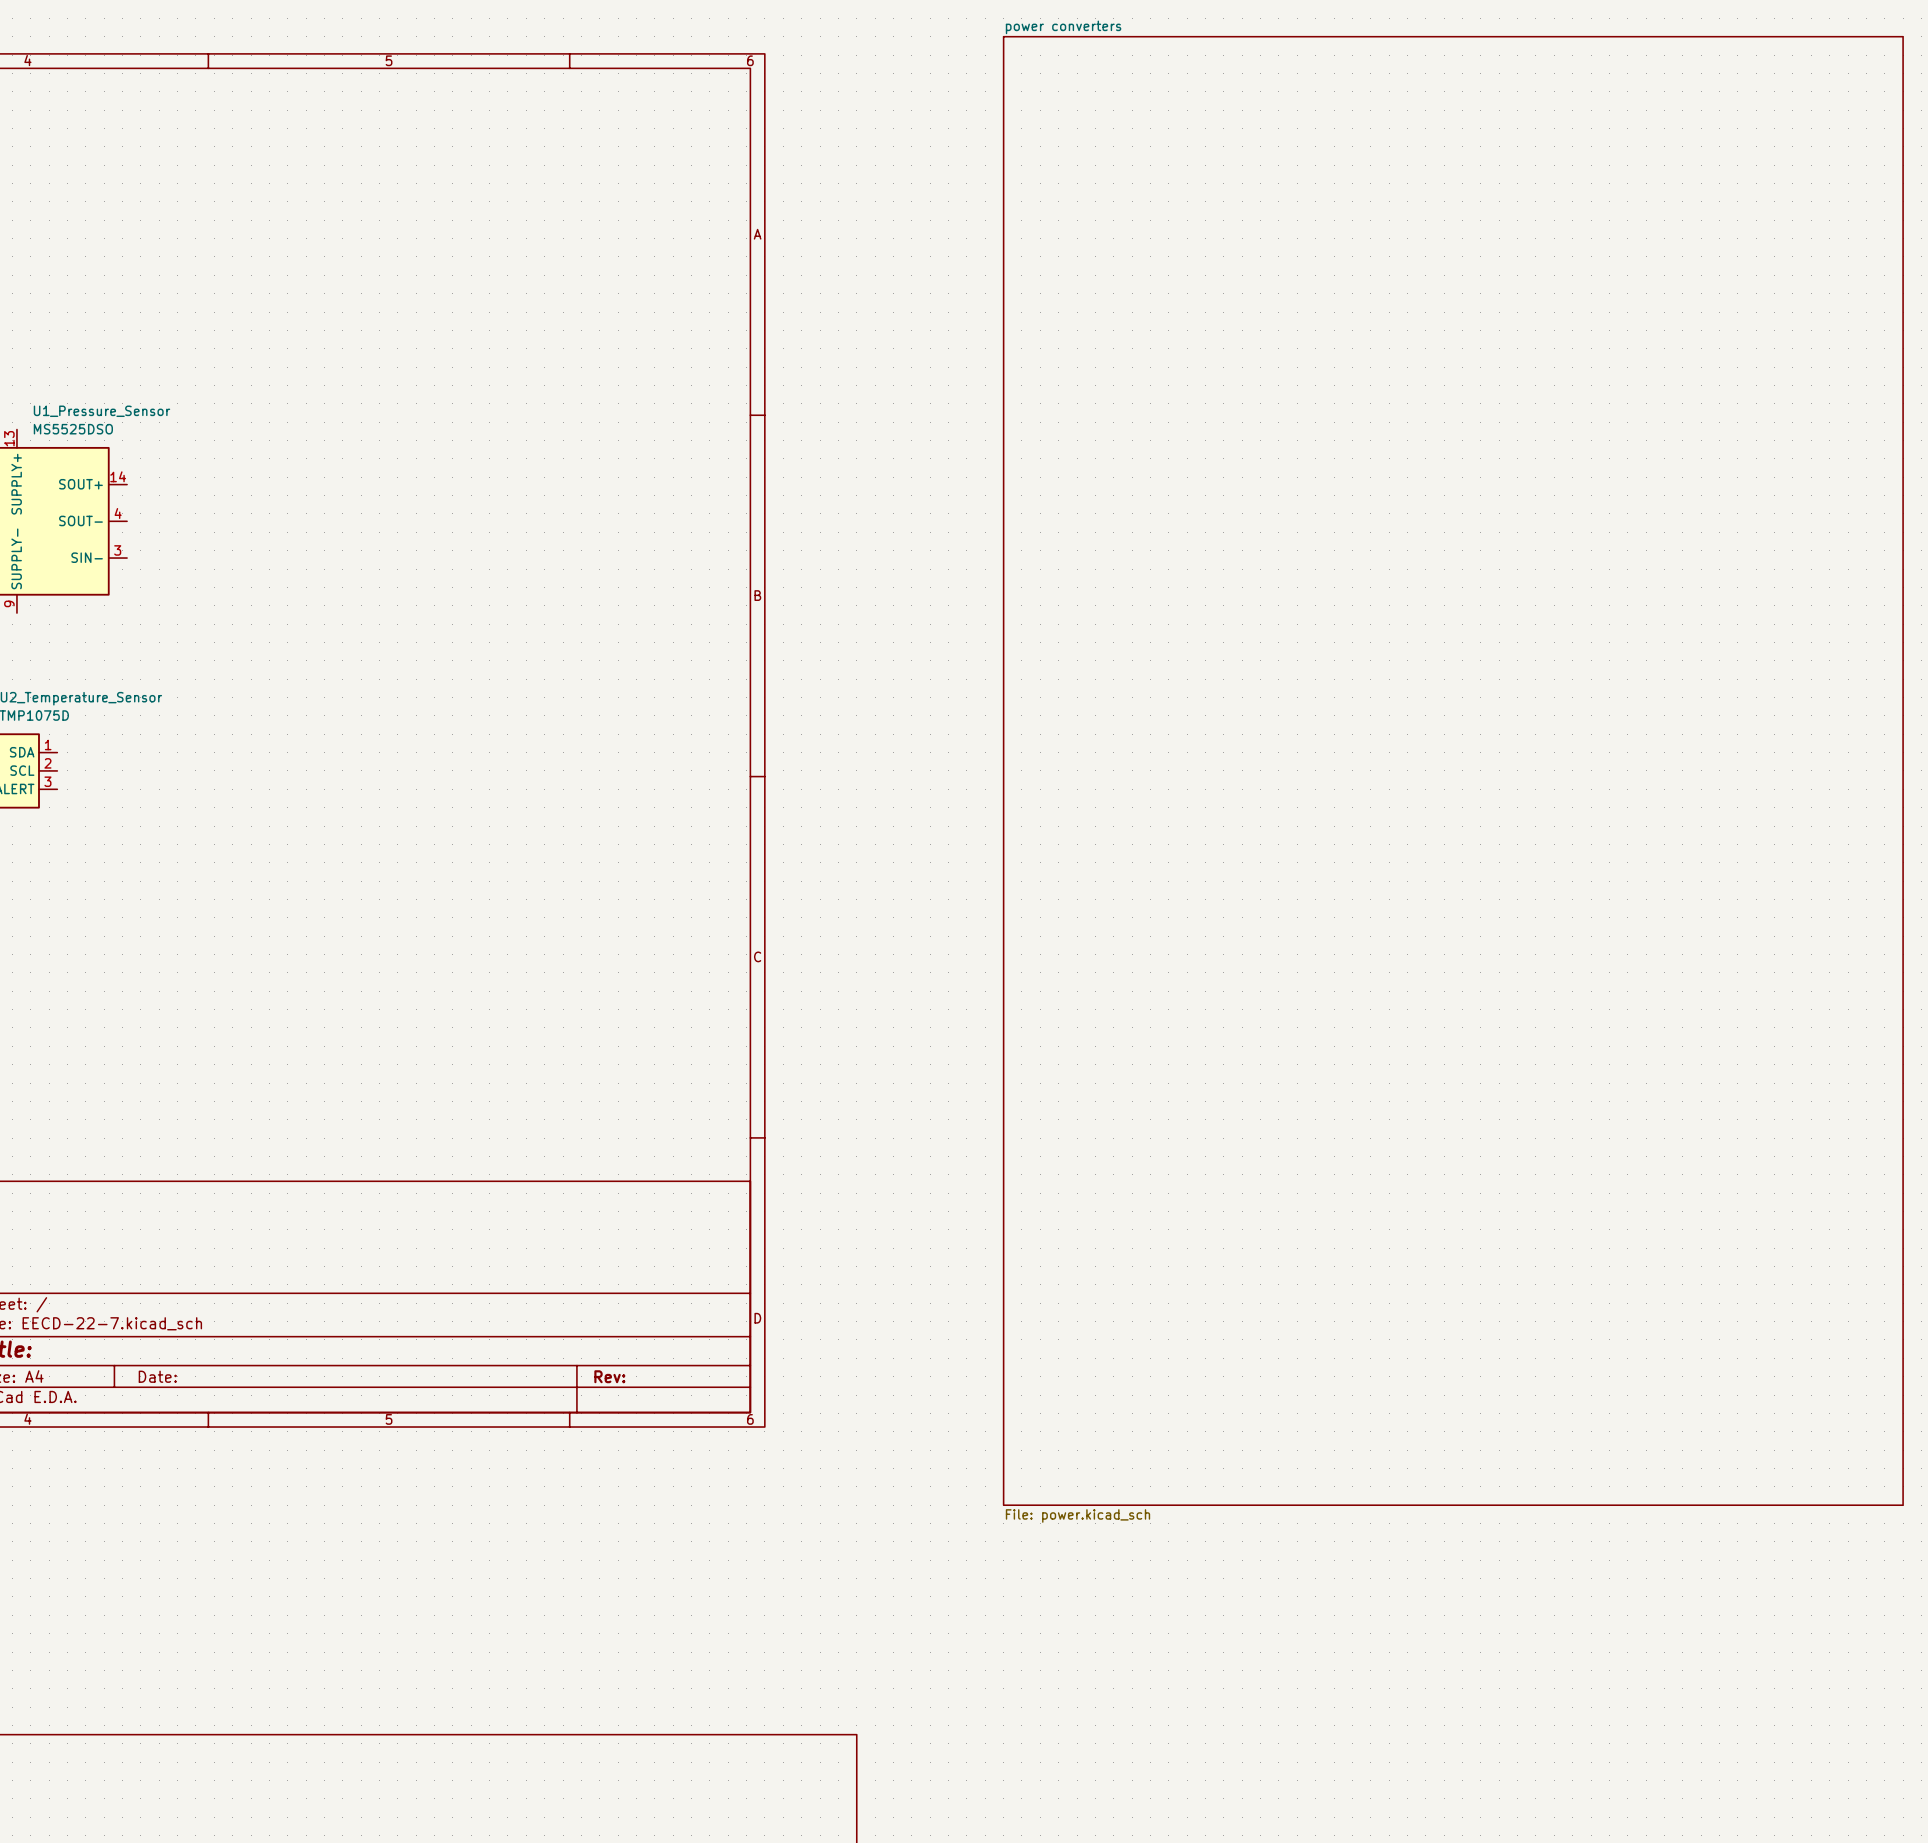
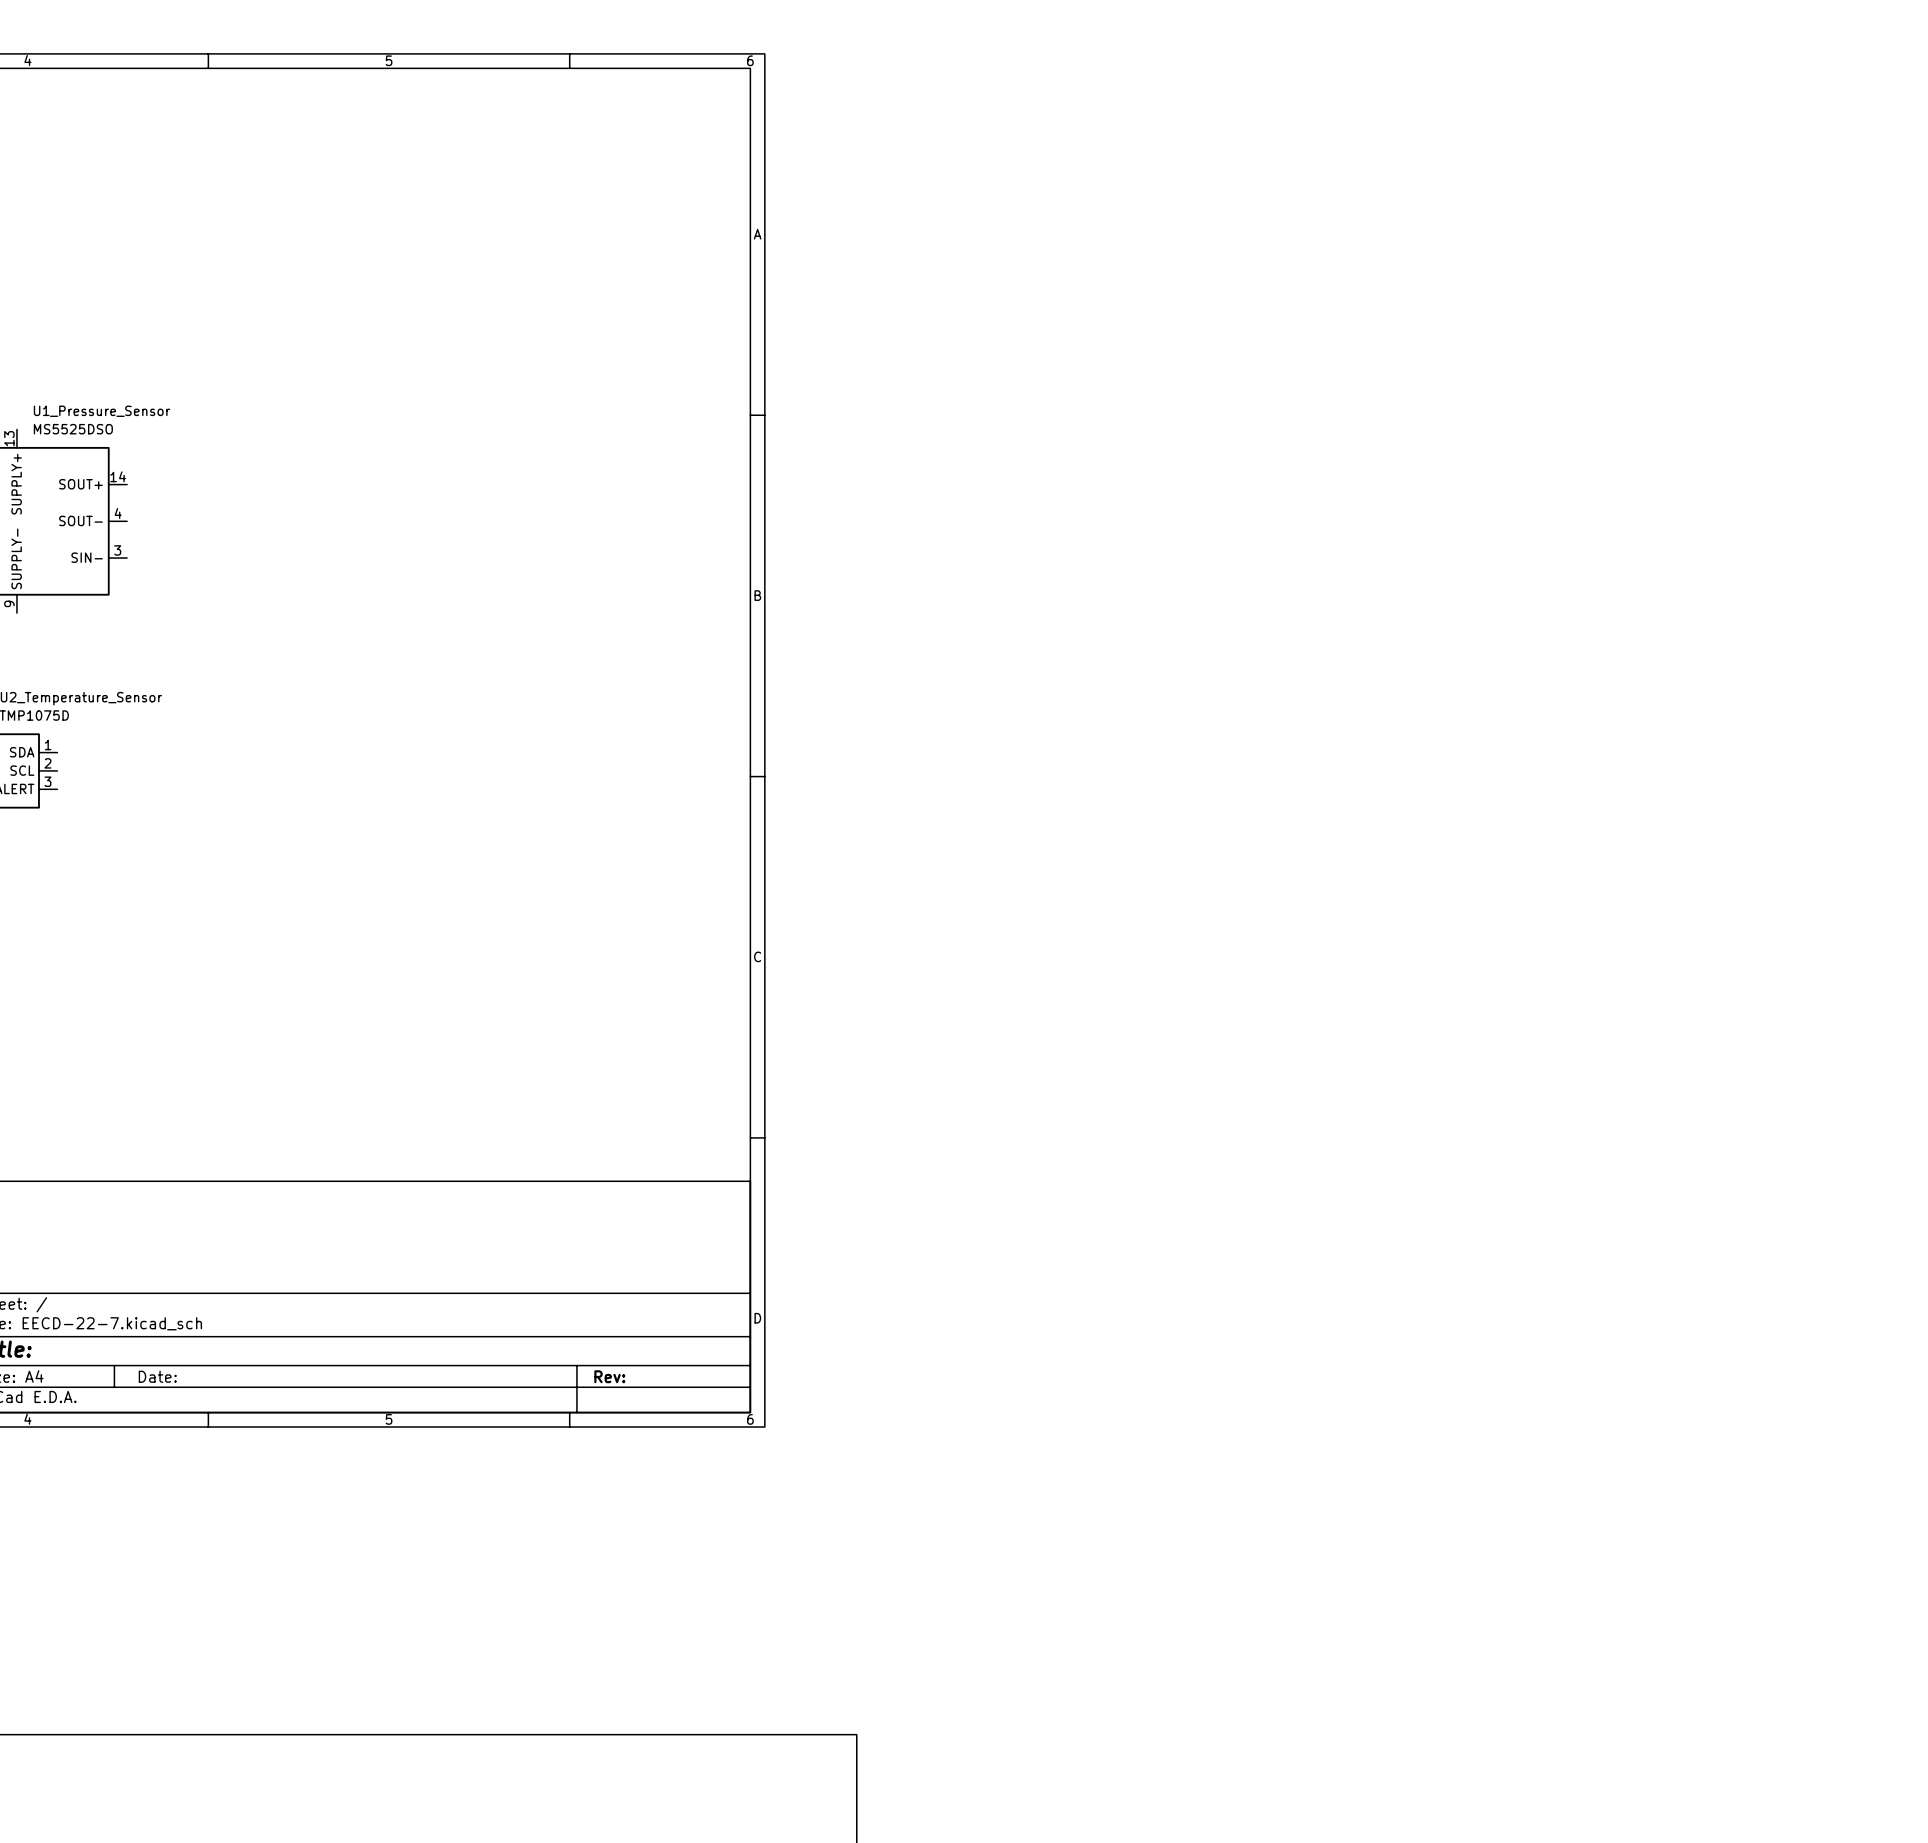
sheet power converters: File: power.kicad_sch (1453, 770) -> none

